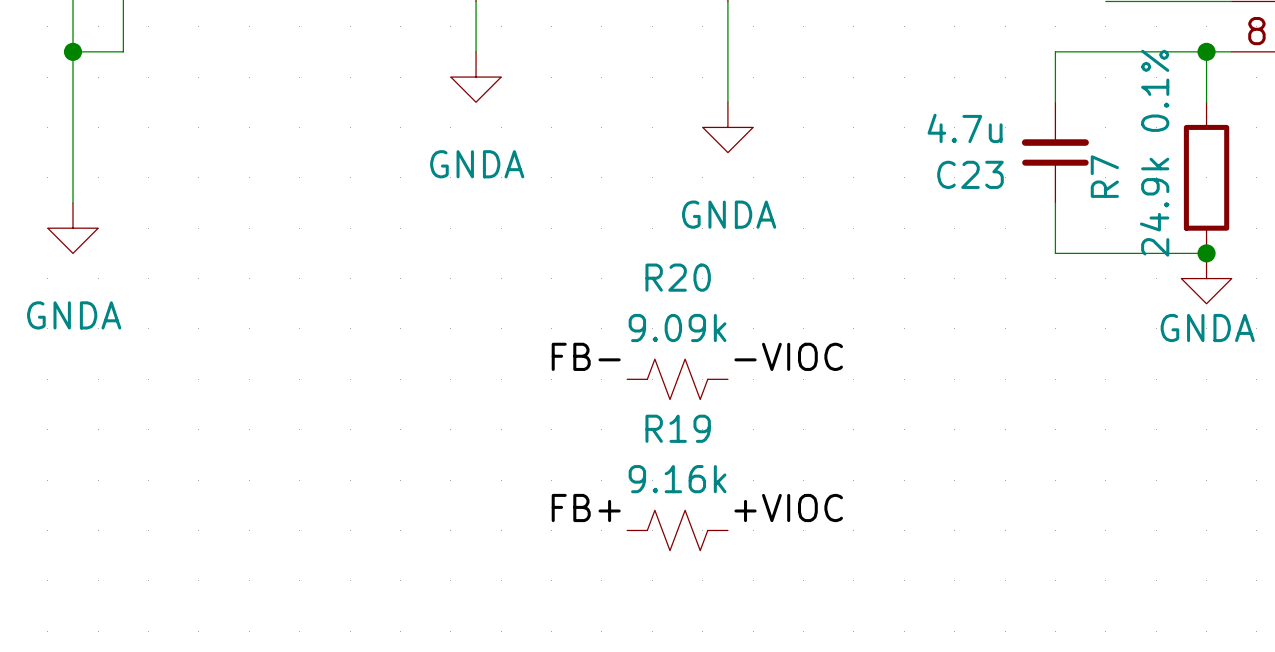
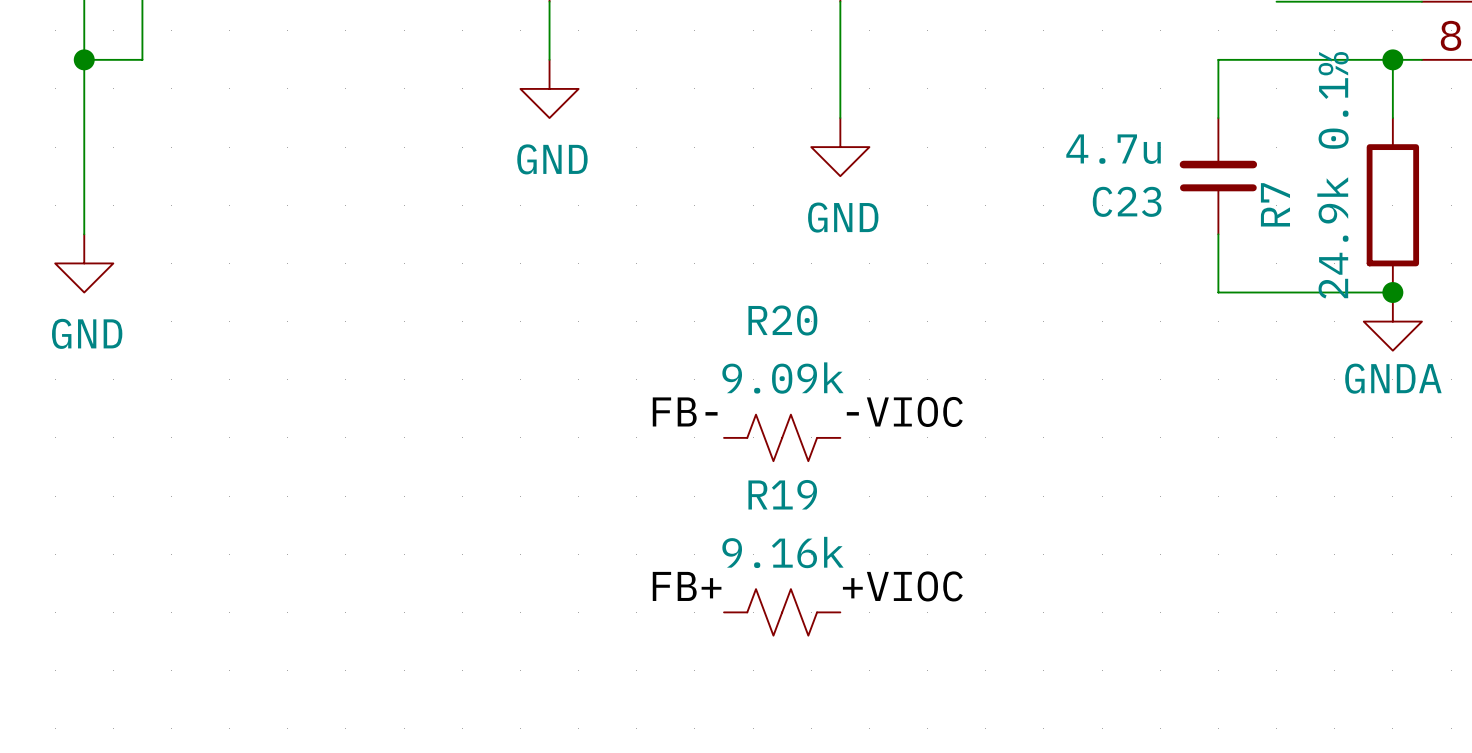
power symbol: GNDA (476, 77) -> GND (549, 88)
power symbol: GNDA (727, 127) -> GND (840, 147)
power symbol: GNDA (72, 228) -> GND (84, 263)

